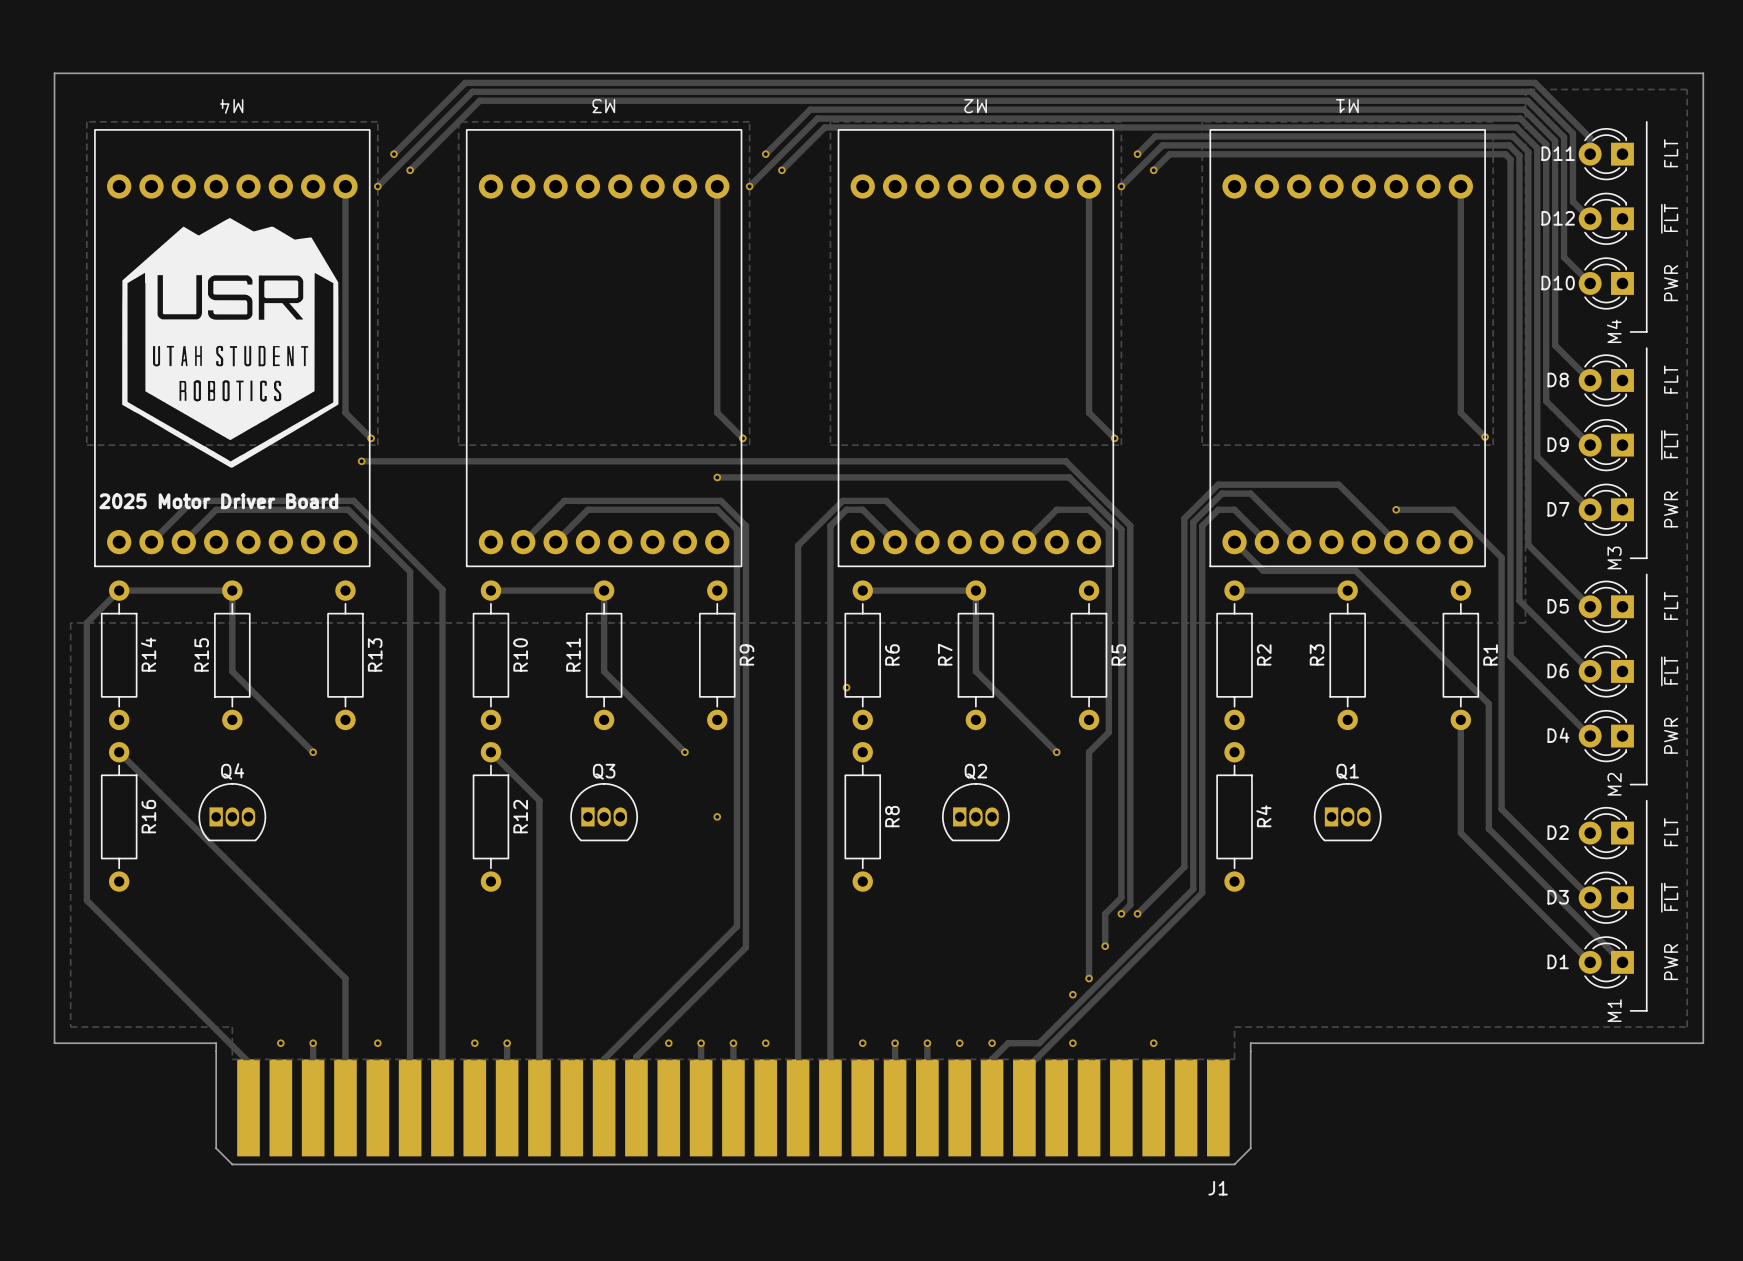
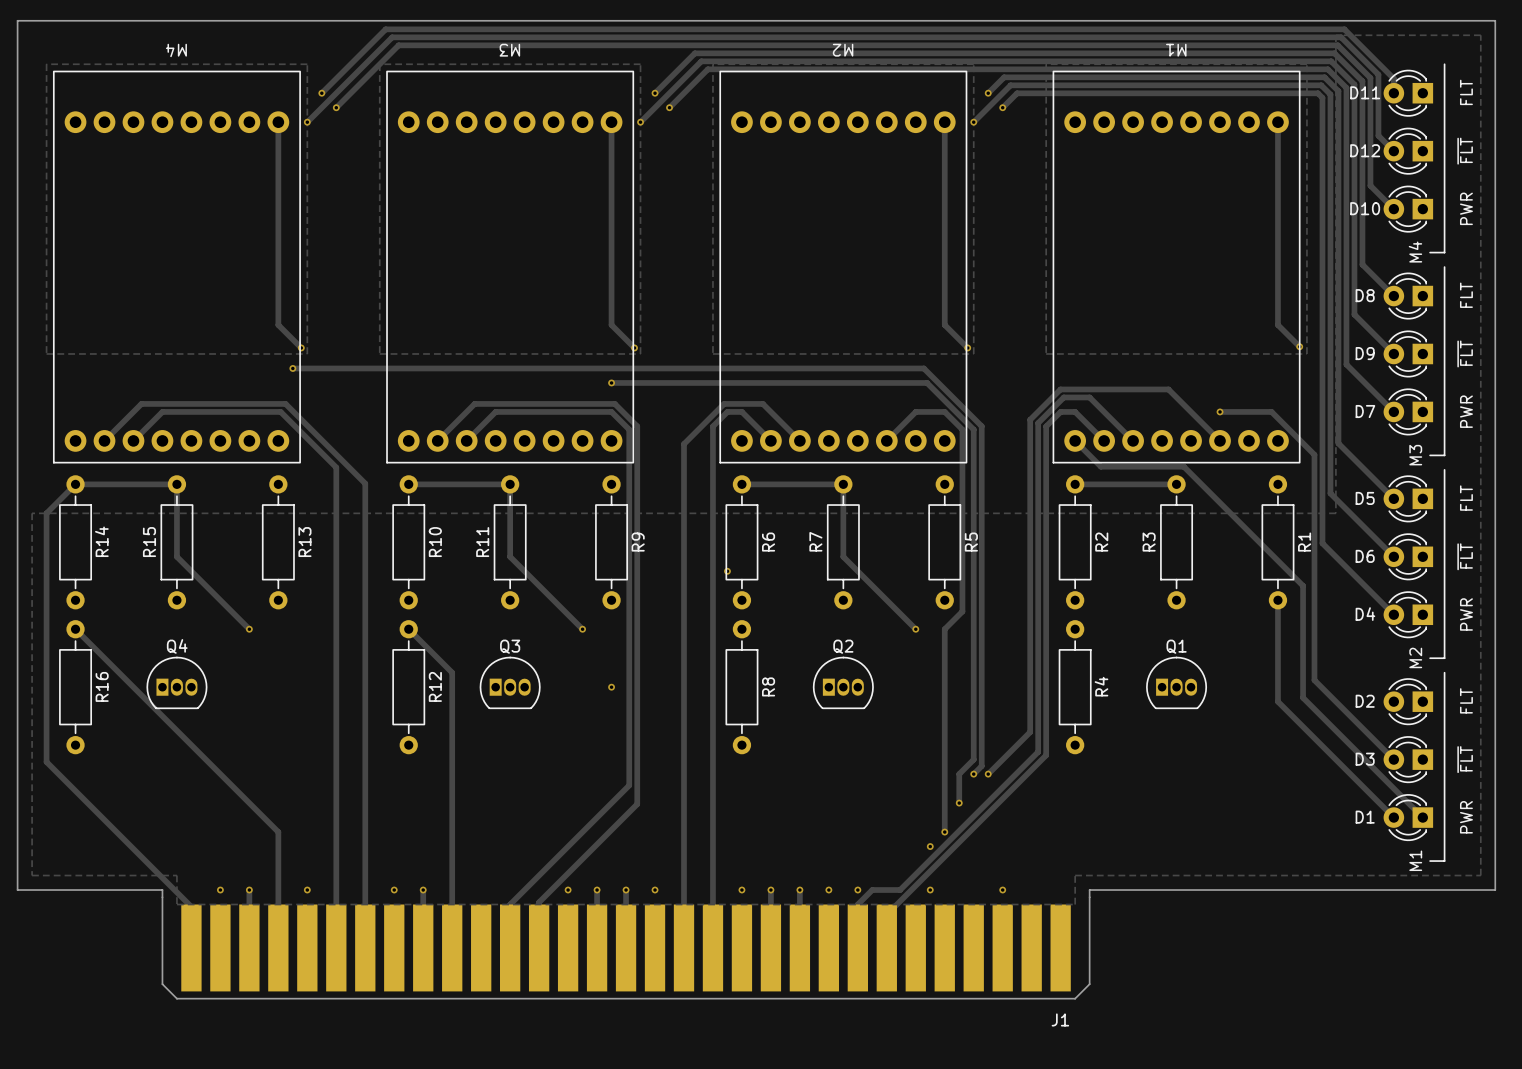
drawing: [122, 218, 339, 468] -> none
text: 2025 Motor Driver Board (218, 501) -> none

